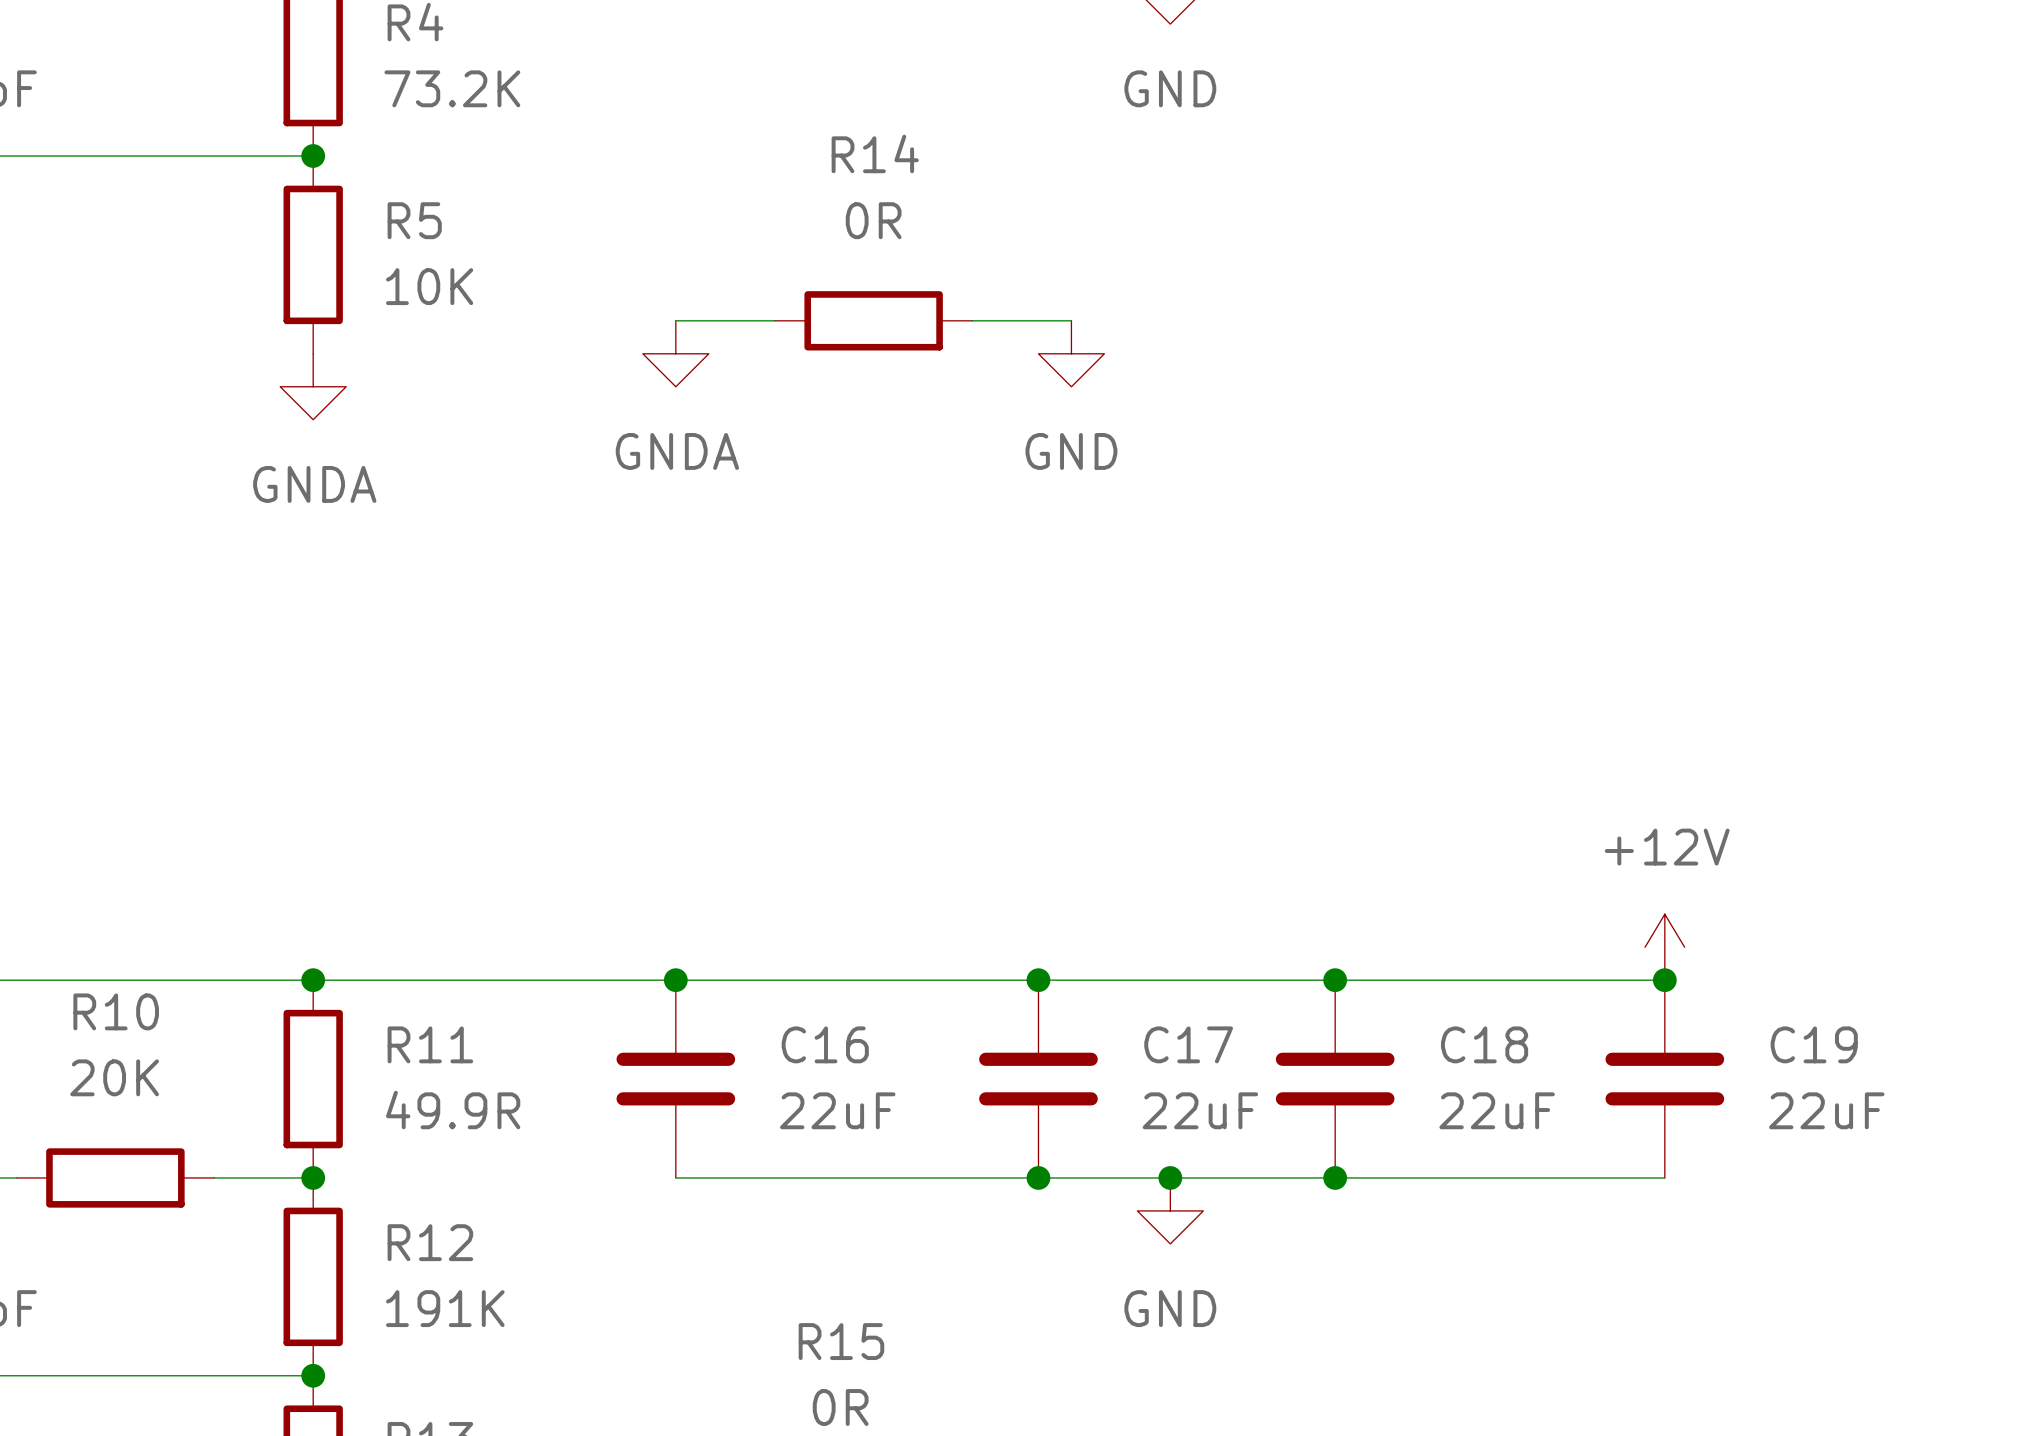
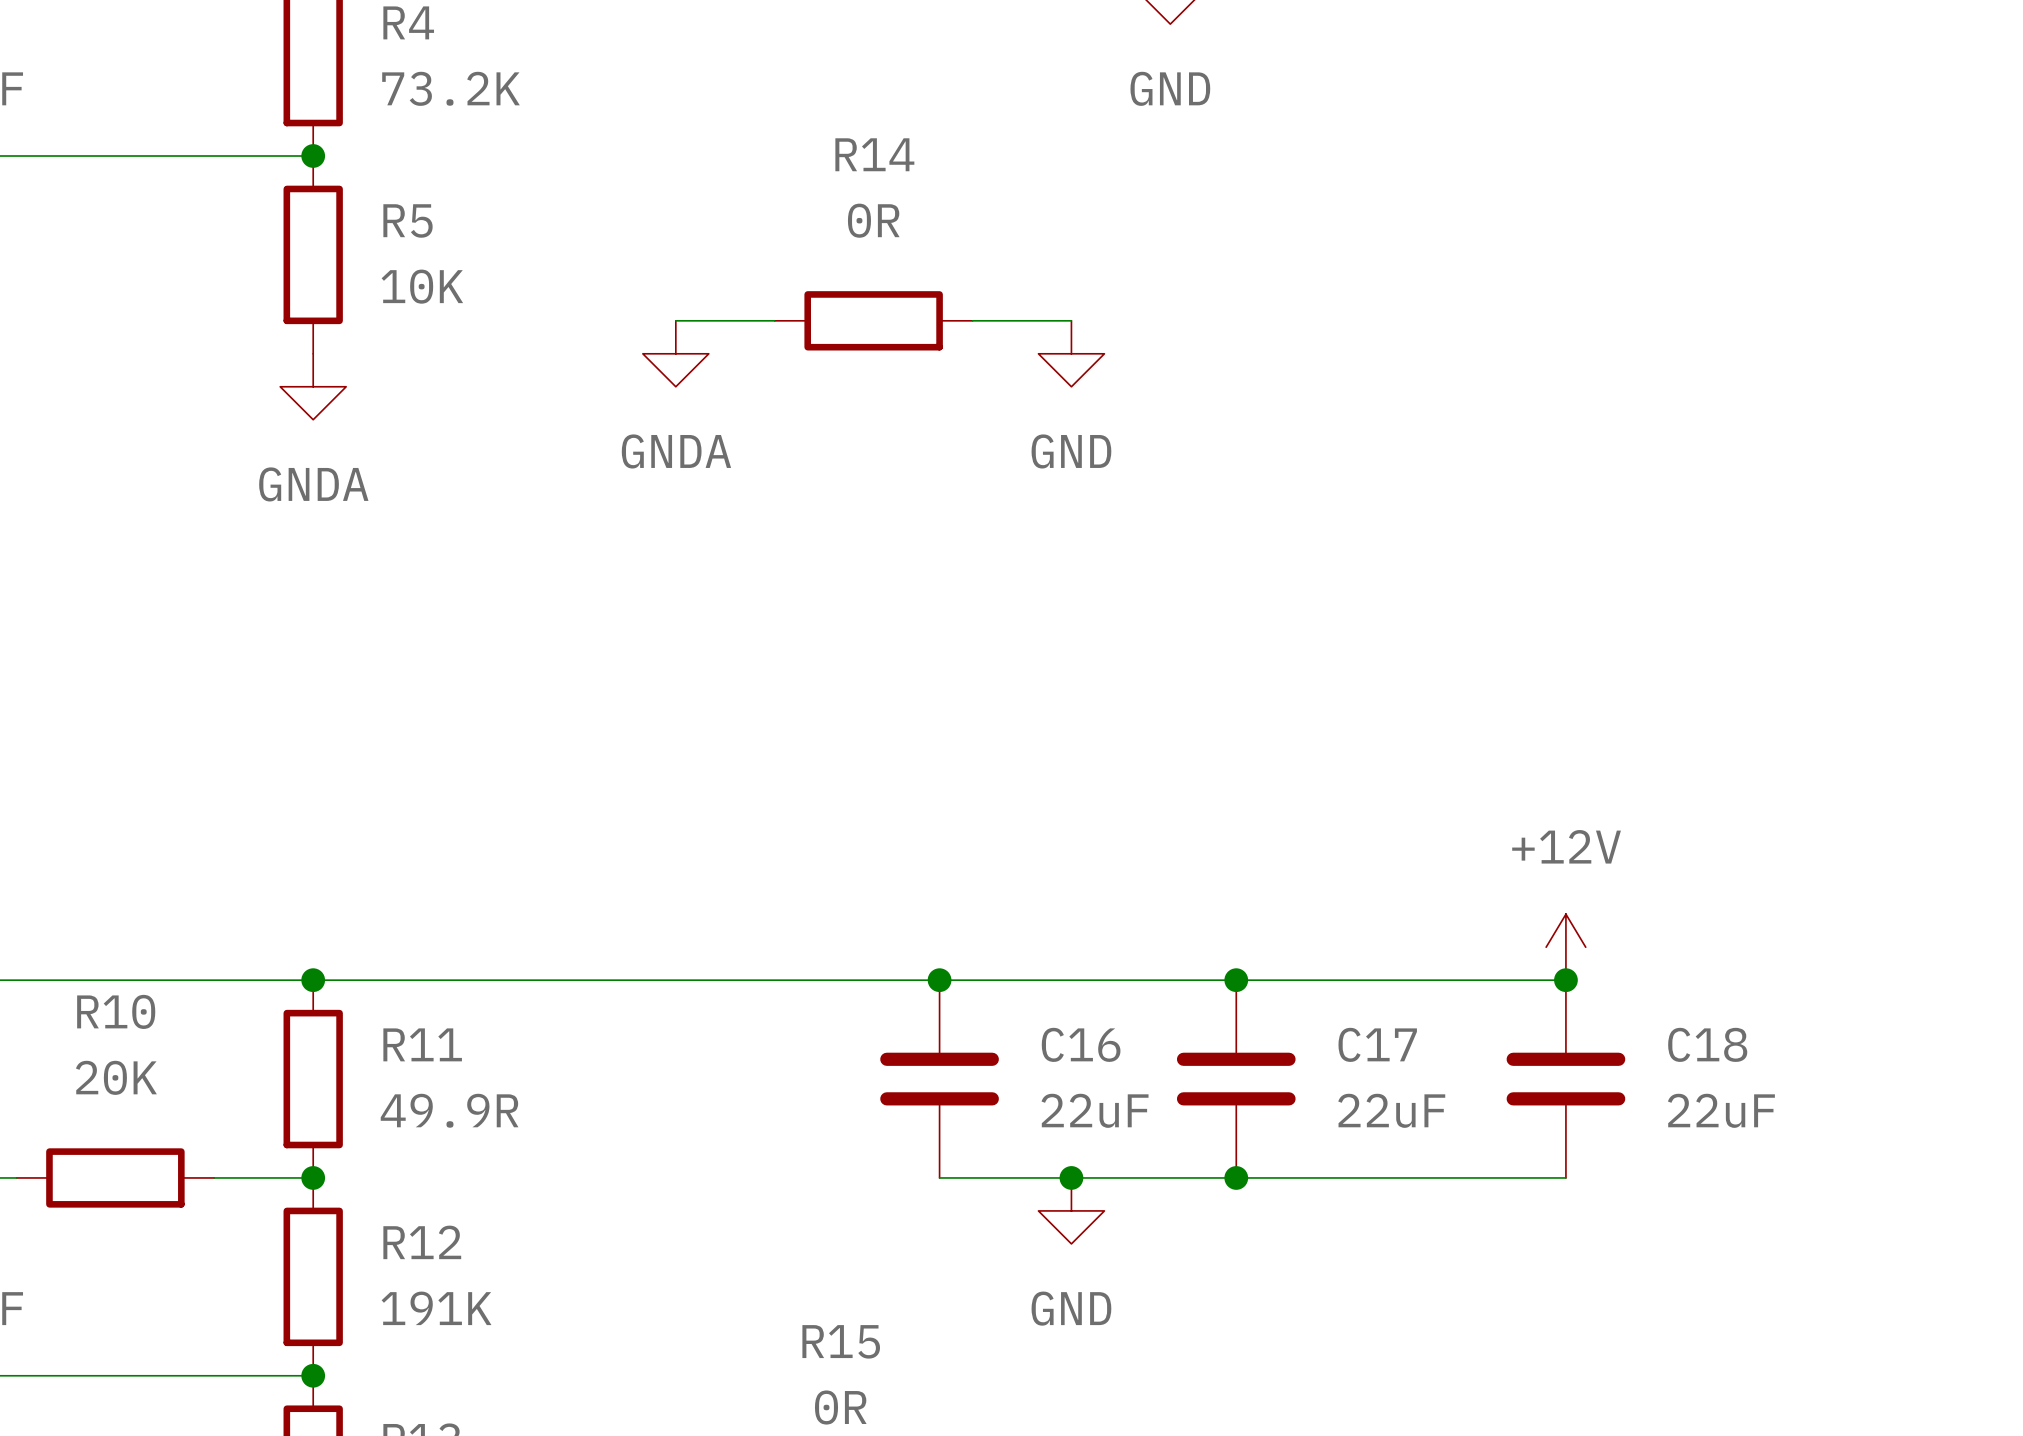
power symbol position: +12V (1664, 947) -> +12V (1565, 947)
junction: (675, 980) -> none
junction: none -> (939, 980)
junction: (1038, 980) -> none
junction: none -> (1236, 980)
junction: (1335, 980) -> none
wire: (1565, 980) (1664, 980) -> none
junction position: (1664, 980) -> (1565, 980)
C16 position: (675, 1079) -> (939, 1079)
C17 position: (1038, 1079) -> (1236, 1079)
C18 position: (1335, 1079) -> (1565, 1079)
C19: 22uF (1664, 1079) -> none
wire: (675, 1177) (939, 1177) -> none
junction position: (1038, 1177) -> (1071, 1177)
junction: (1170, 1177) -> none
junction: none -> (1236, 1177)
junction: (1335, 1177) -> none
wire: (1565, 1177) (1664, 1177) -> none
power symbol position: GND (1170, 1210) -> GND (1071, 1210)

